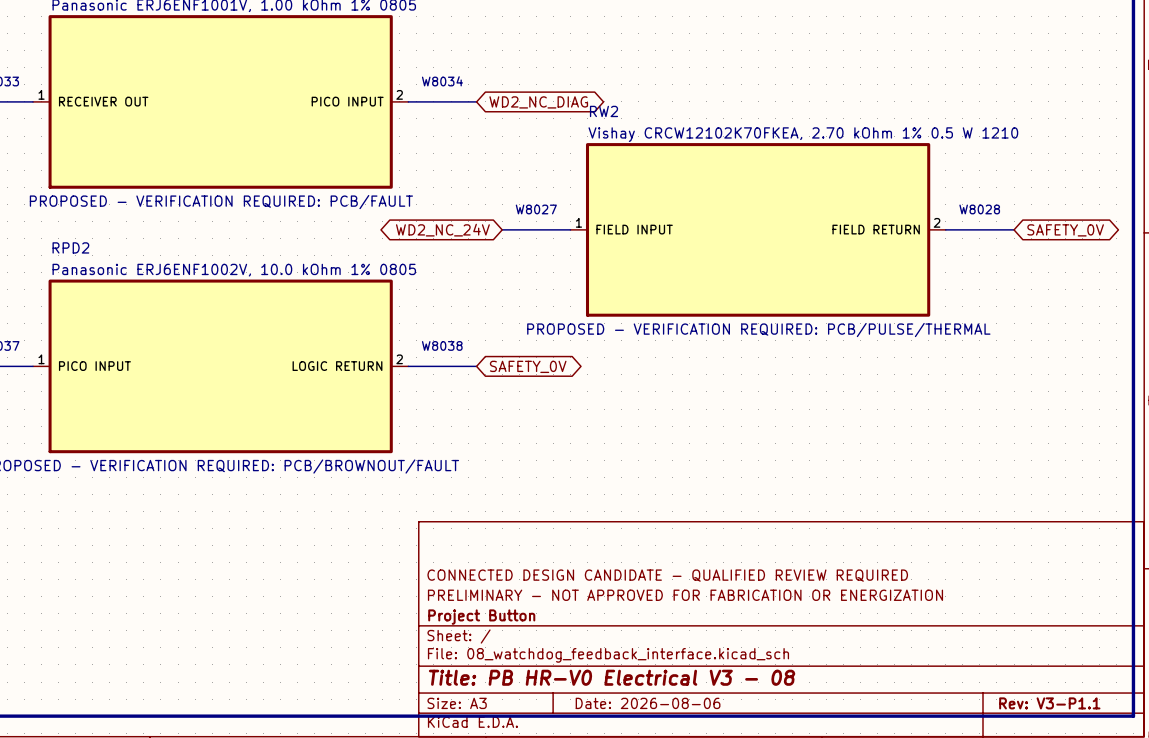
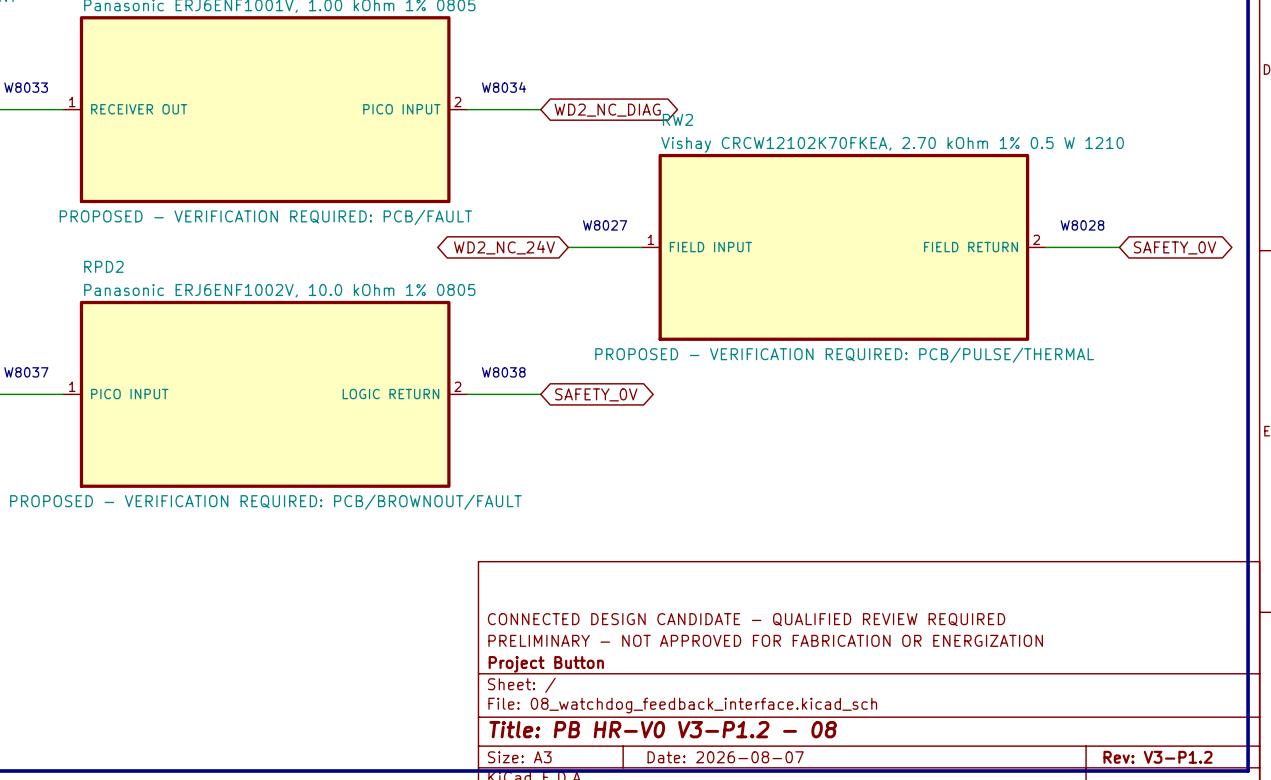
title block: Title: PB HR-V0 Electrical V3 - 08 (612, 677) -> Title: PB HR-V0 V3-P1.2 - 08 (663, 729)
title block: Date: 2026-08-06 (648, 703) -> Date: 2026-08-07 (725, 757)
title block: Rev: V3-P1.1 (1049, 703) -> Rev: V3-P1.2 (1157, 757)

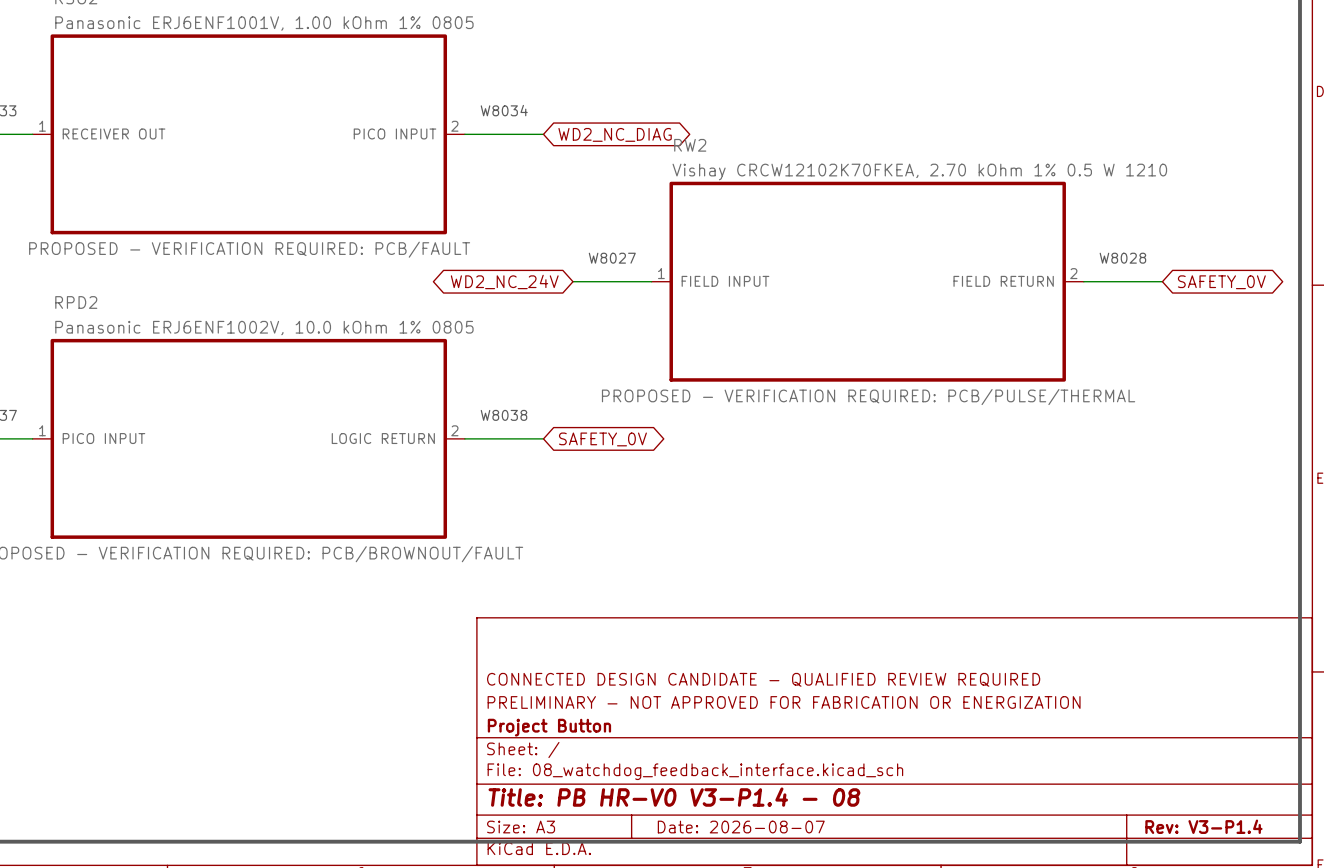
title block: Title: PB HR-V0 V3-P1.2 - 08 (663, 729) -> Title: PB HR-V0 V3-P1.4 - 08 (674, 797)
title block: Rev: V3-P1.2 (1157, 757) -> Rev: V3-P1.4 (1203, 826)

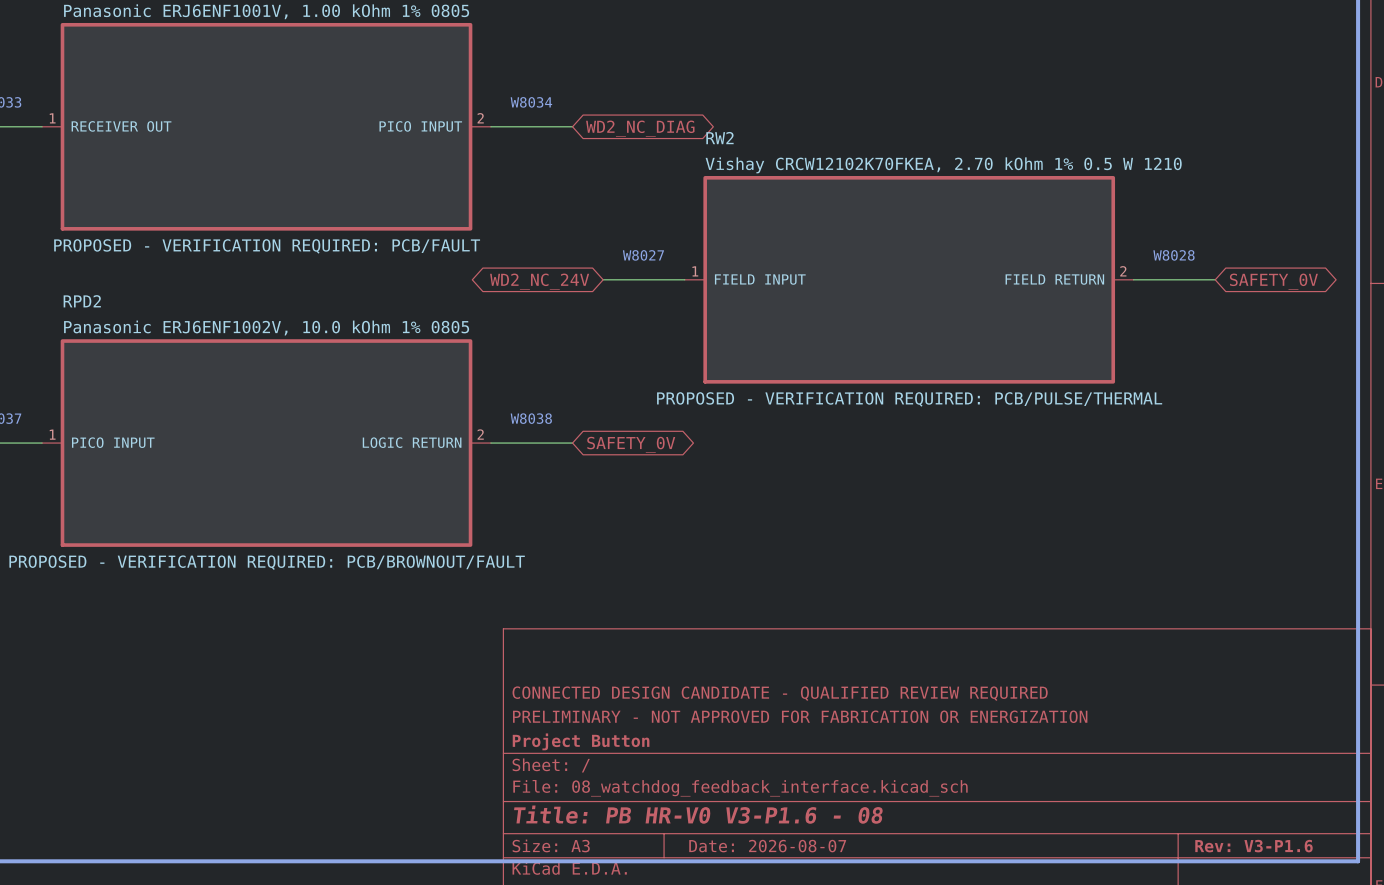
title block: Title: PB HR-V0 V3-P1.4 - 08 (674, 797) -> Title: PB HR-V0 V3-P1.6 - 08 (698, 814)
title block: Rev: V3-P1.4 (1203, 826) -> Rev: V3-P1.6 (1253, 846)

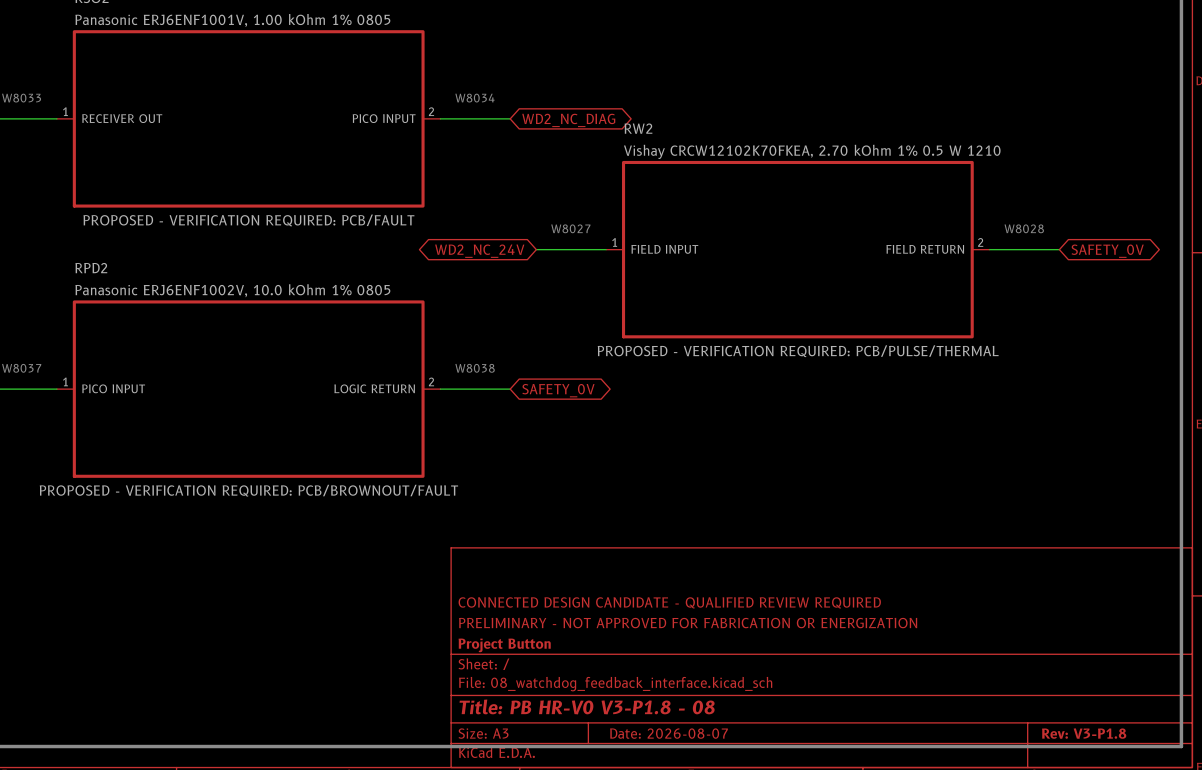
title block: Title: PB HR-V0 V3-P1.6 - 08 (698, 814) -> Title: PB HR-V0 V3-P1.8 - 08 (587, 706)
title block: Rev: V3-P1.6 (1253, 846) -> Rev: V3-P1.8 (1084, 733)

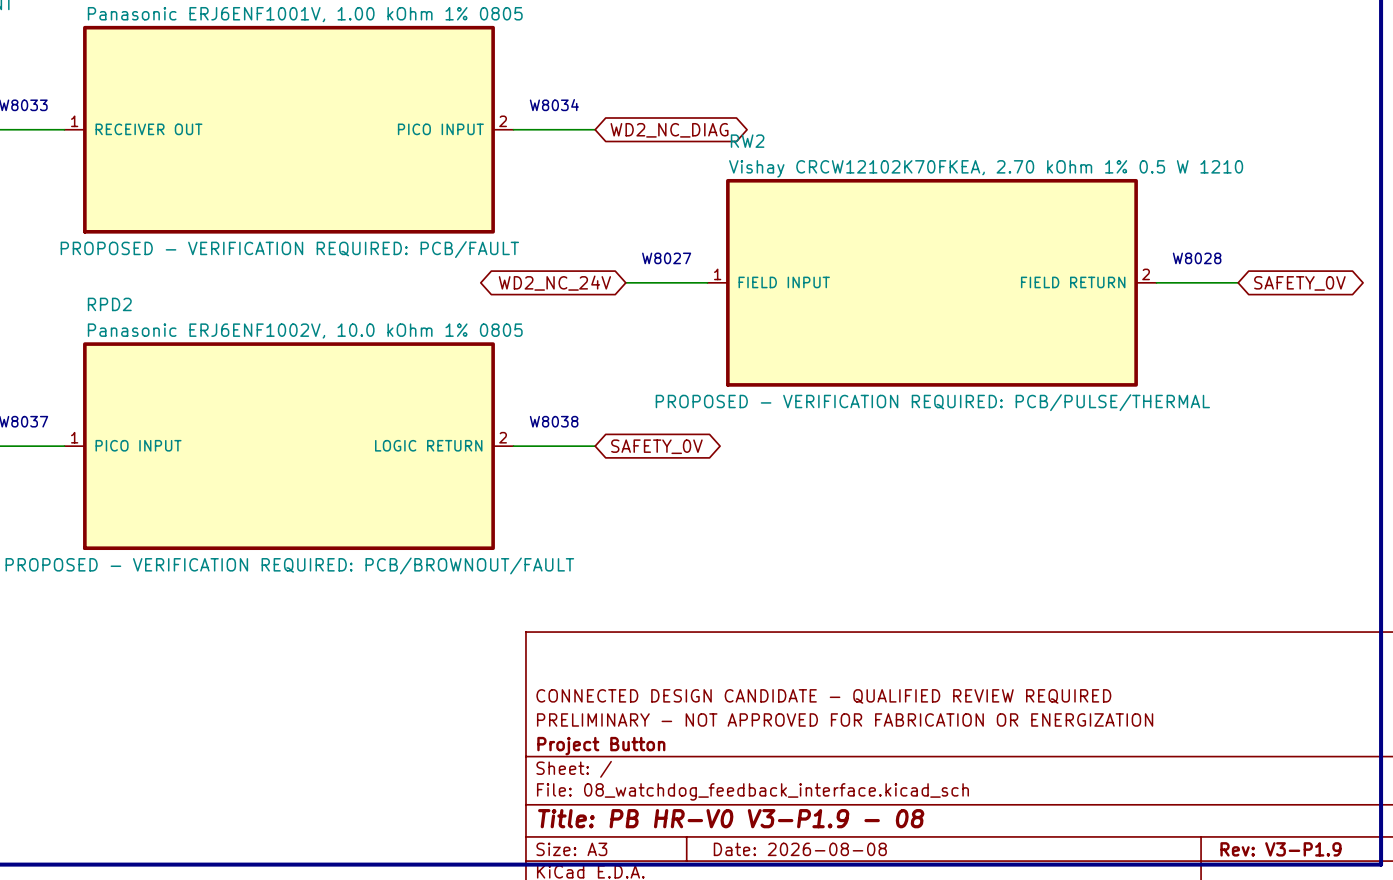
title block: Title: PB HR-V0 V3-P1.8 - 08 (587, 706) -> Title: PB HR-V0 V3-P1.9 - 08 (731, 818)
title block: Date: 2026-08-07 (668, 733) -> Date: 2026-08-08 (800, 849)
title block: Rev: V3-P1.8 (1084, 733) -> Rev: V3-P1.9 (1280, 849)

